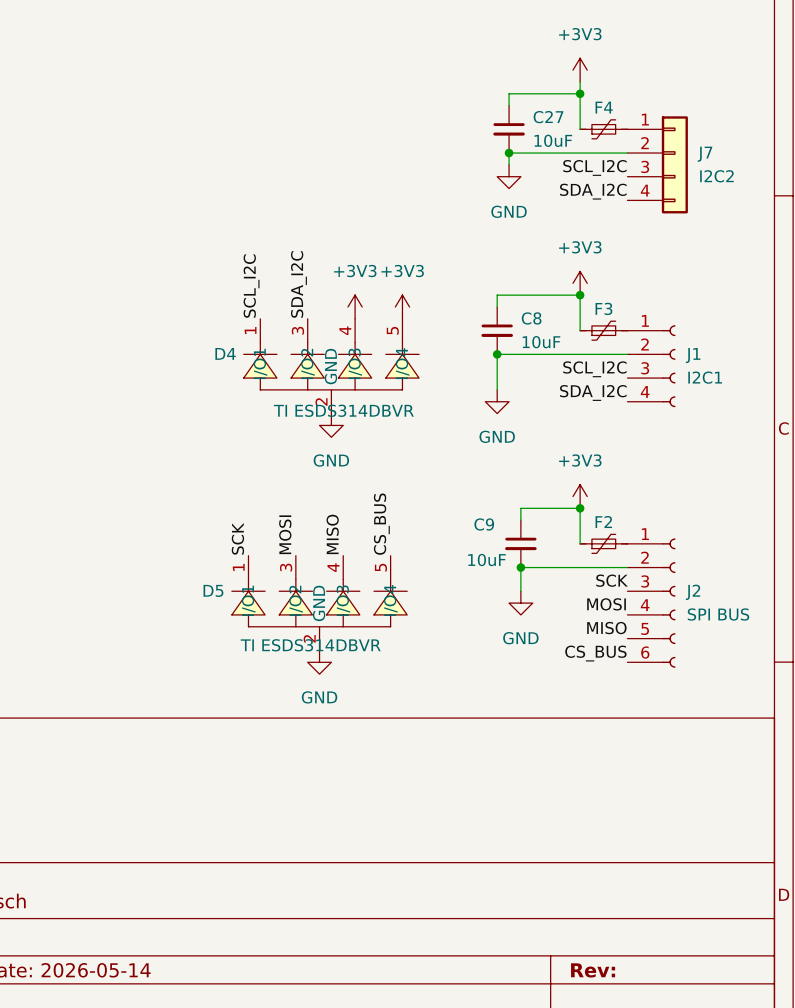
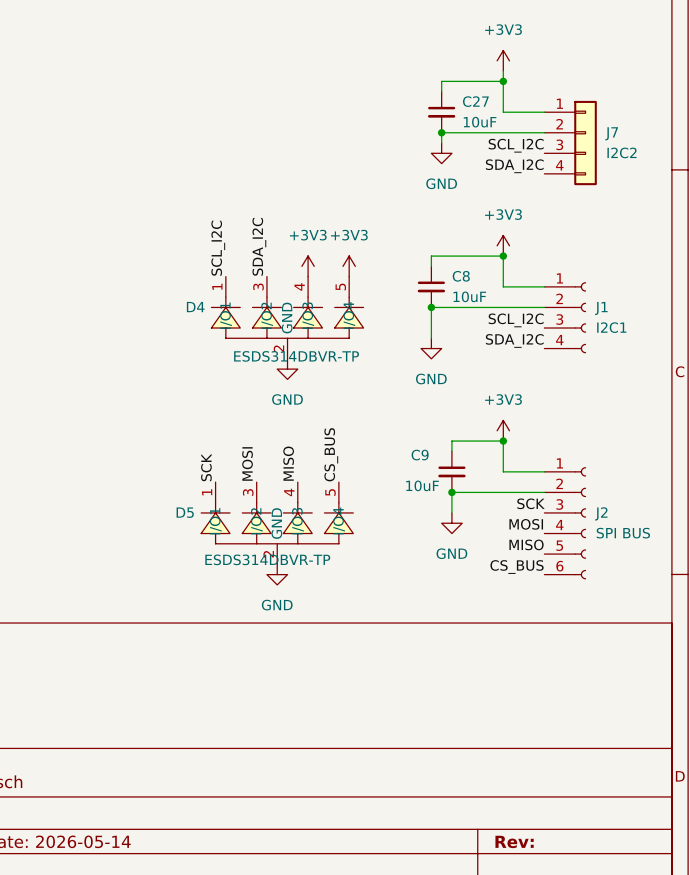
F4: (603, 129) -> none
F3: (603, 330) -> none
D4 value: TI ESDS314DBVR (343, 410) -> ESDS314DBVR-TP (296, 356)
F2: (603, 543) -> none
D5 value: TI ESDS314DBVR (310, 645) -> ESDS314DBVR-TP (267, 559)

